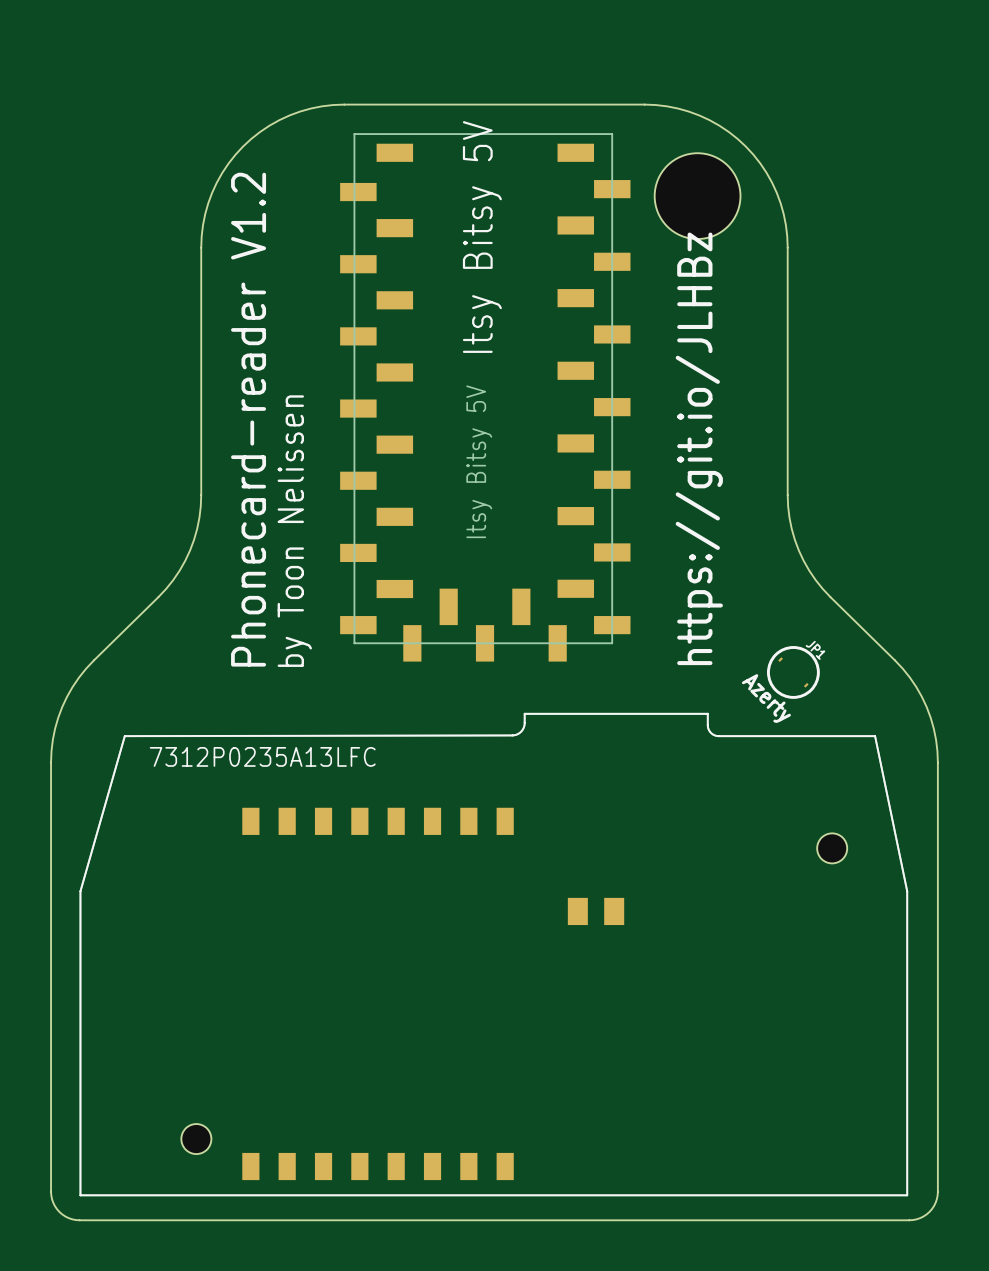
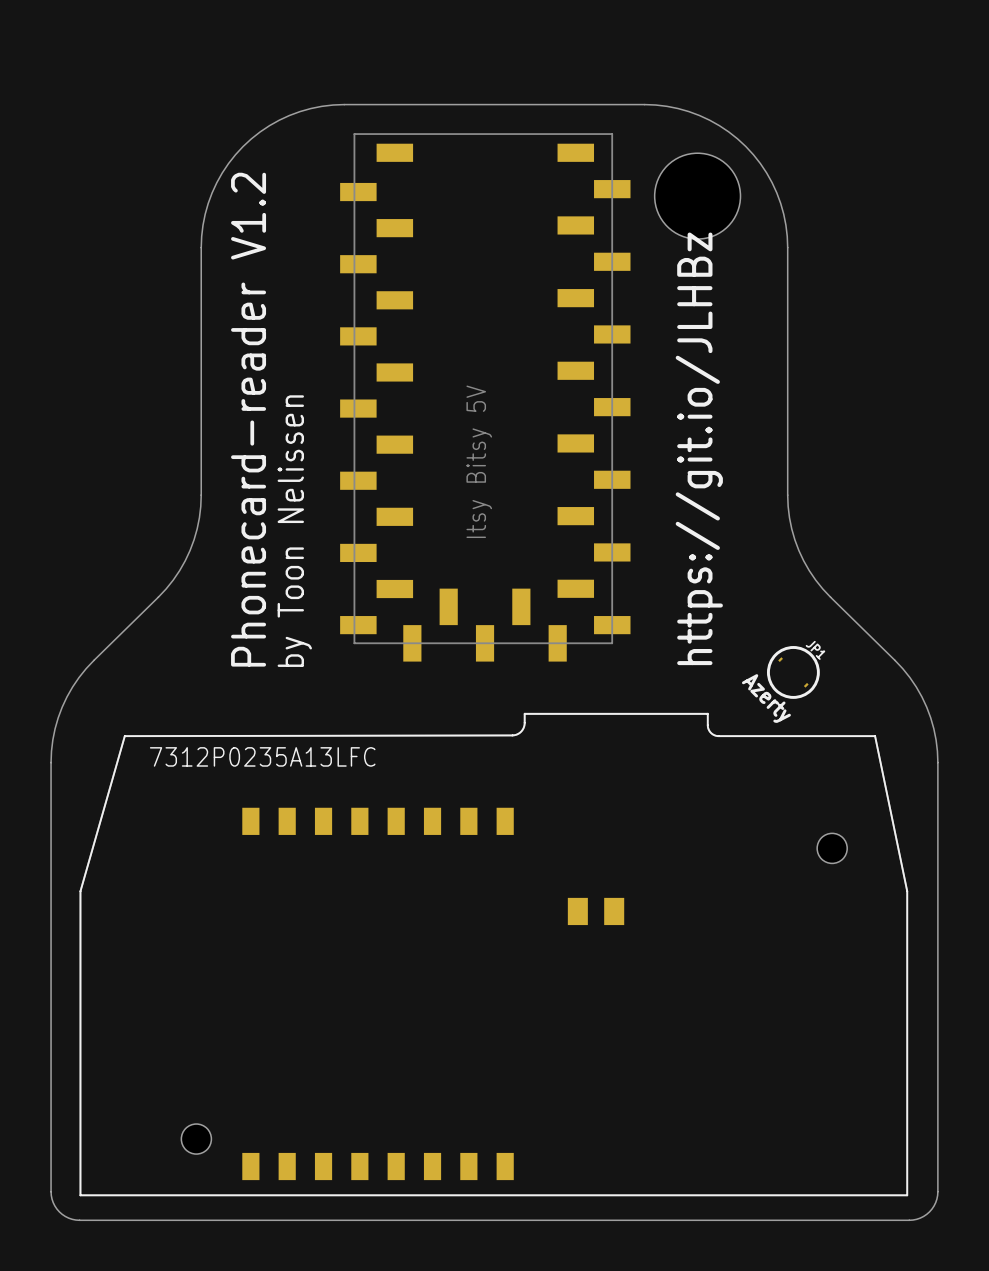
text: Itsy Bitsy 5V (482, 237) -> none

